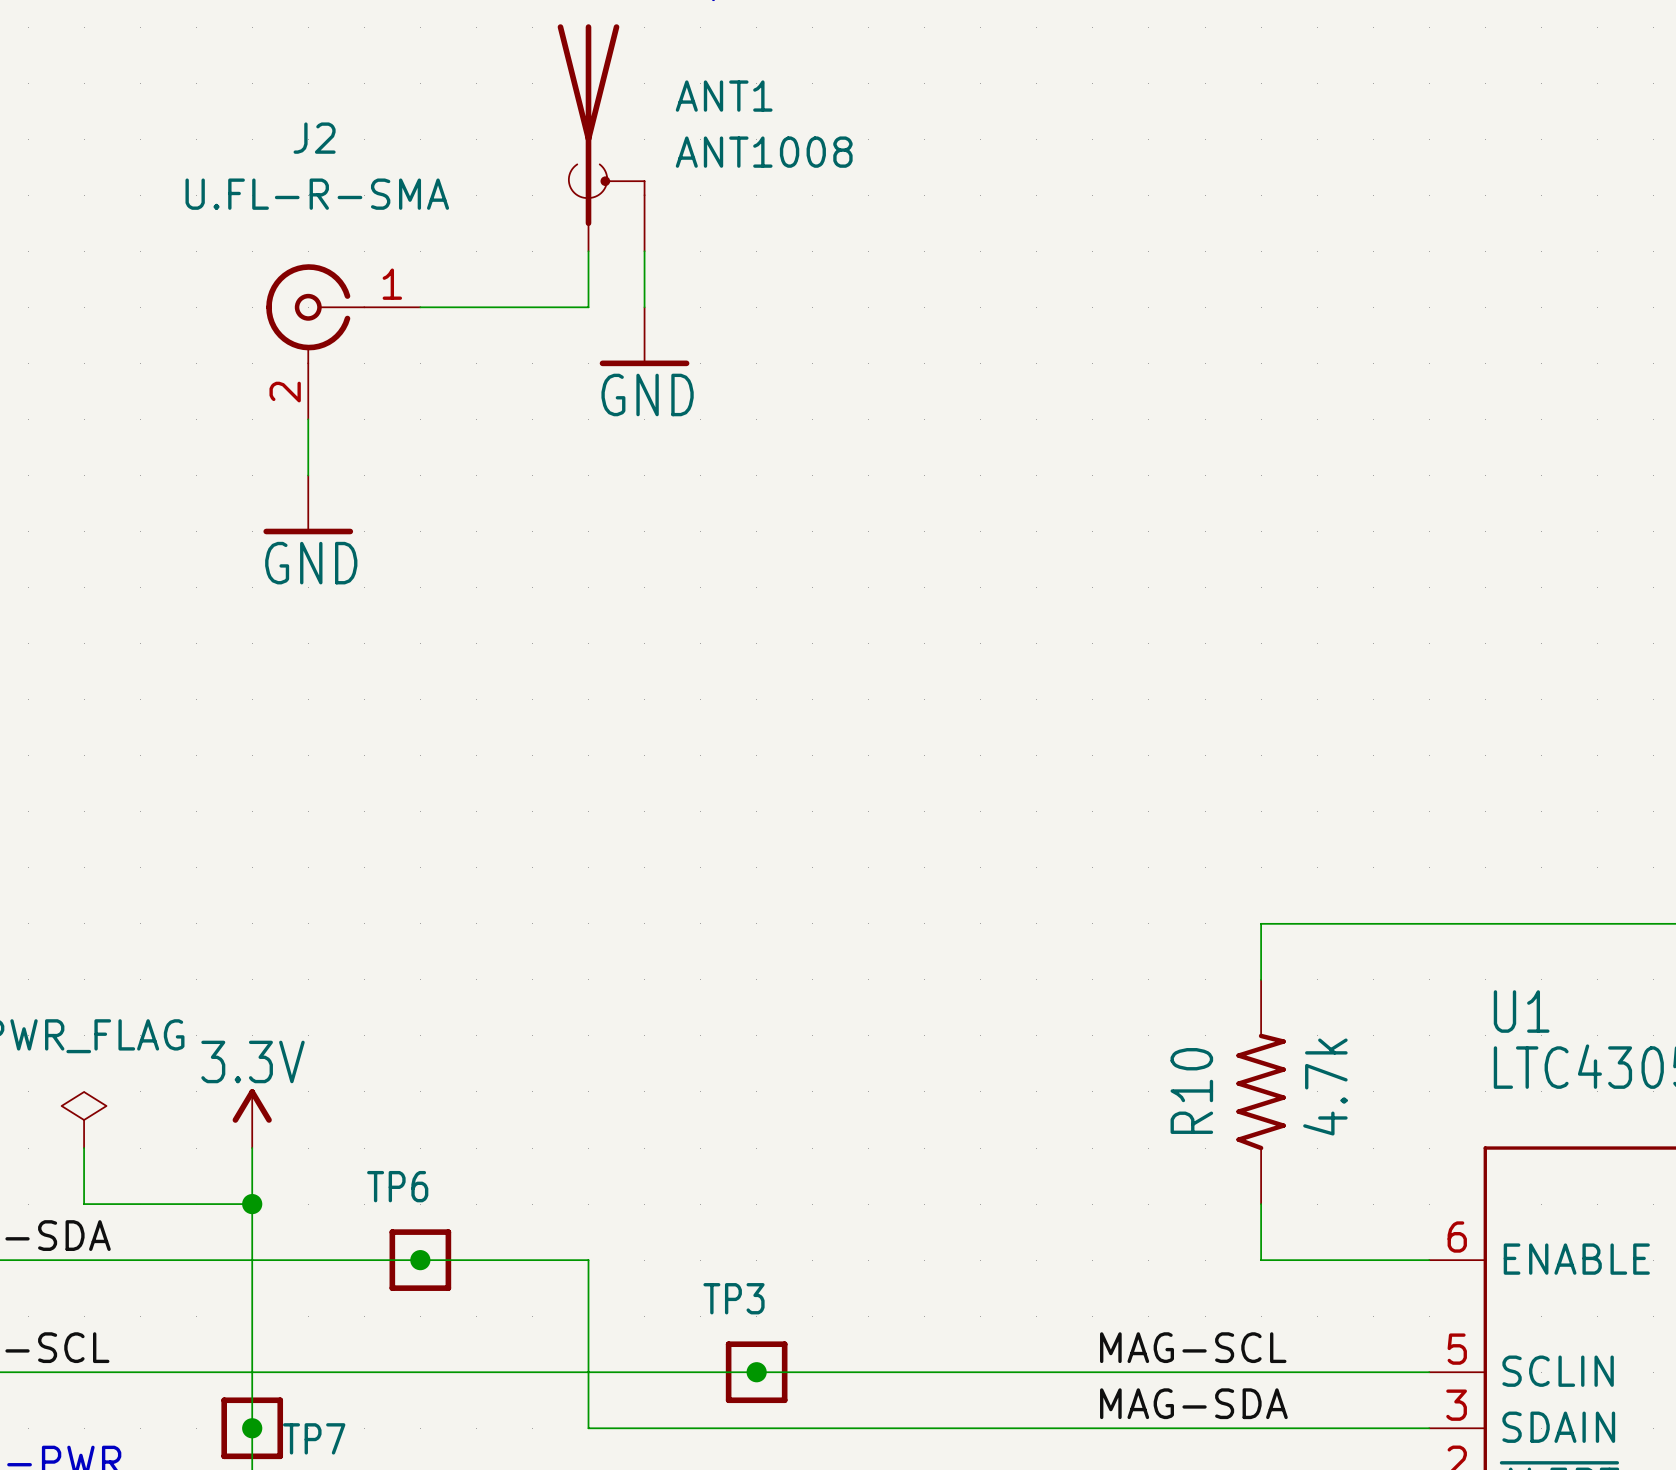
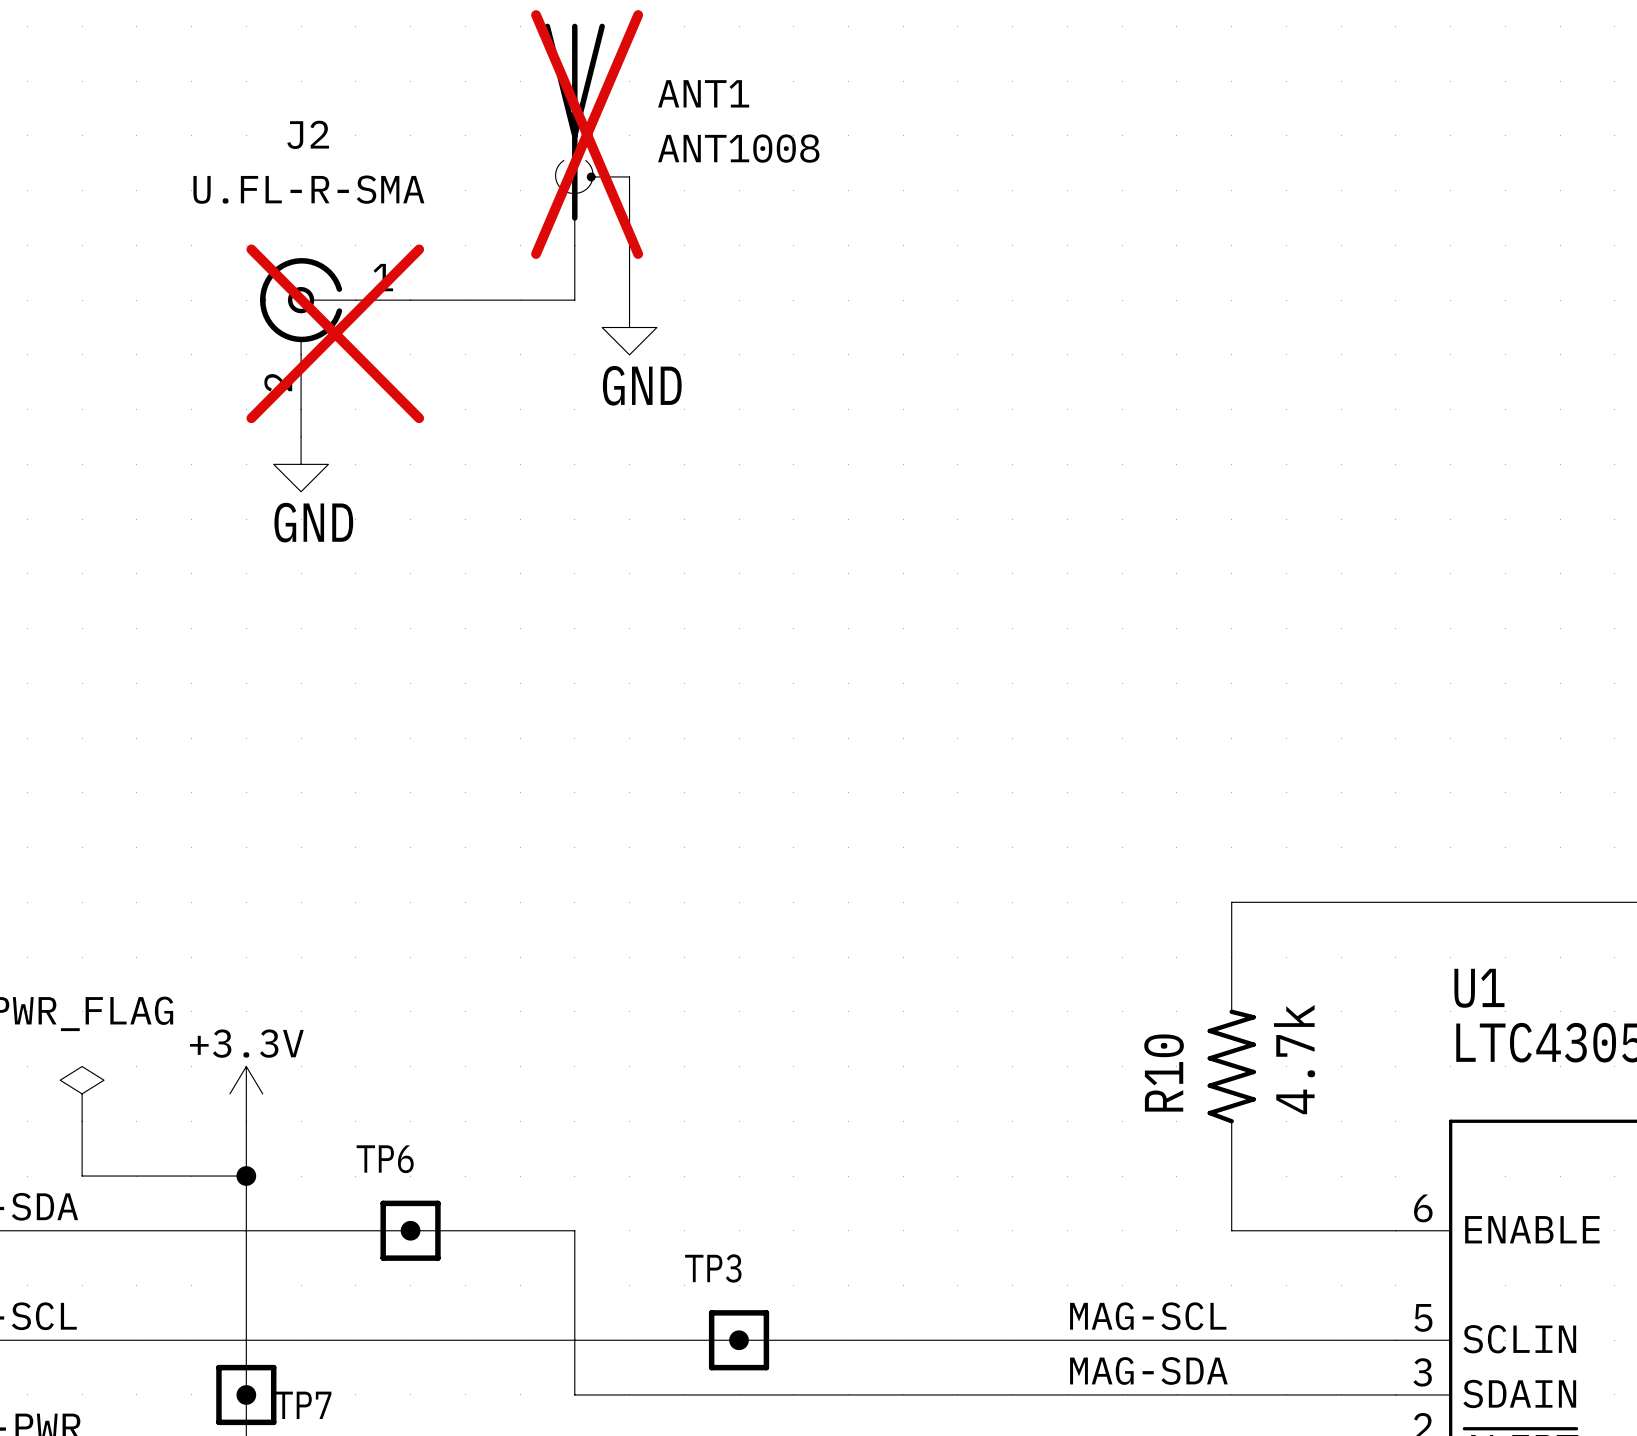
ANT1 do-not-place cross: none -> (587, 134)
power symbol shape: [599, 307, 690, 367] -> [602, 300, 657, 355]
J2 do-not-place cross: none -> (335, 333)
power symbol: none -> GND (301, 464)
power symbol: GND (308, 504) -> none
power symbol: 3.3V (252, 1118) -> +3.3V (246, 1093)

